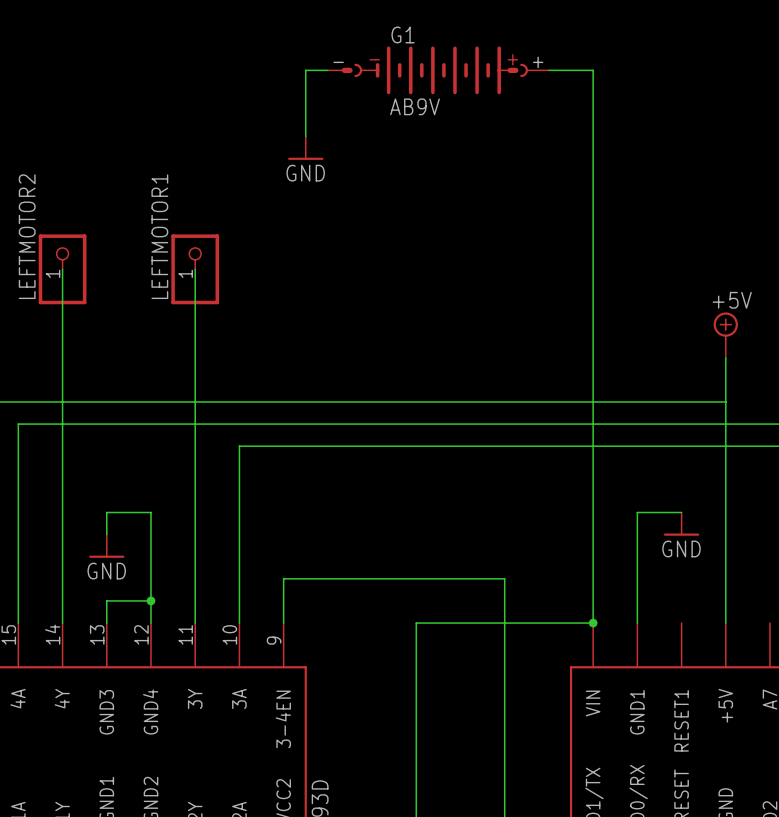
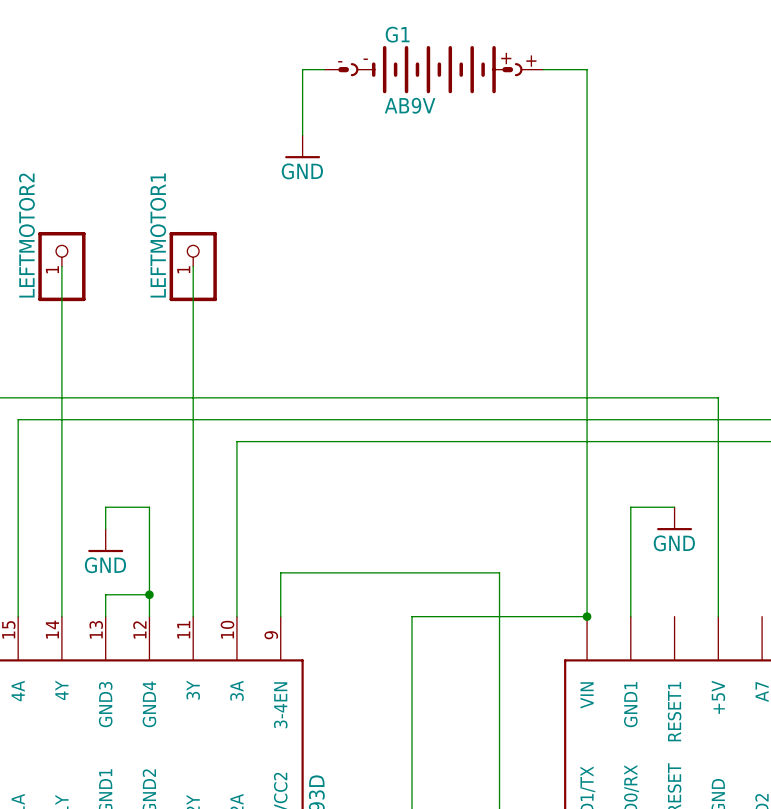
power symbol: +5V (725, 335) -> none
wire: (725, 357) (725, 401) -> none

